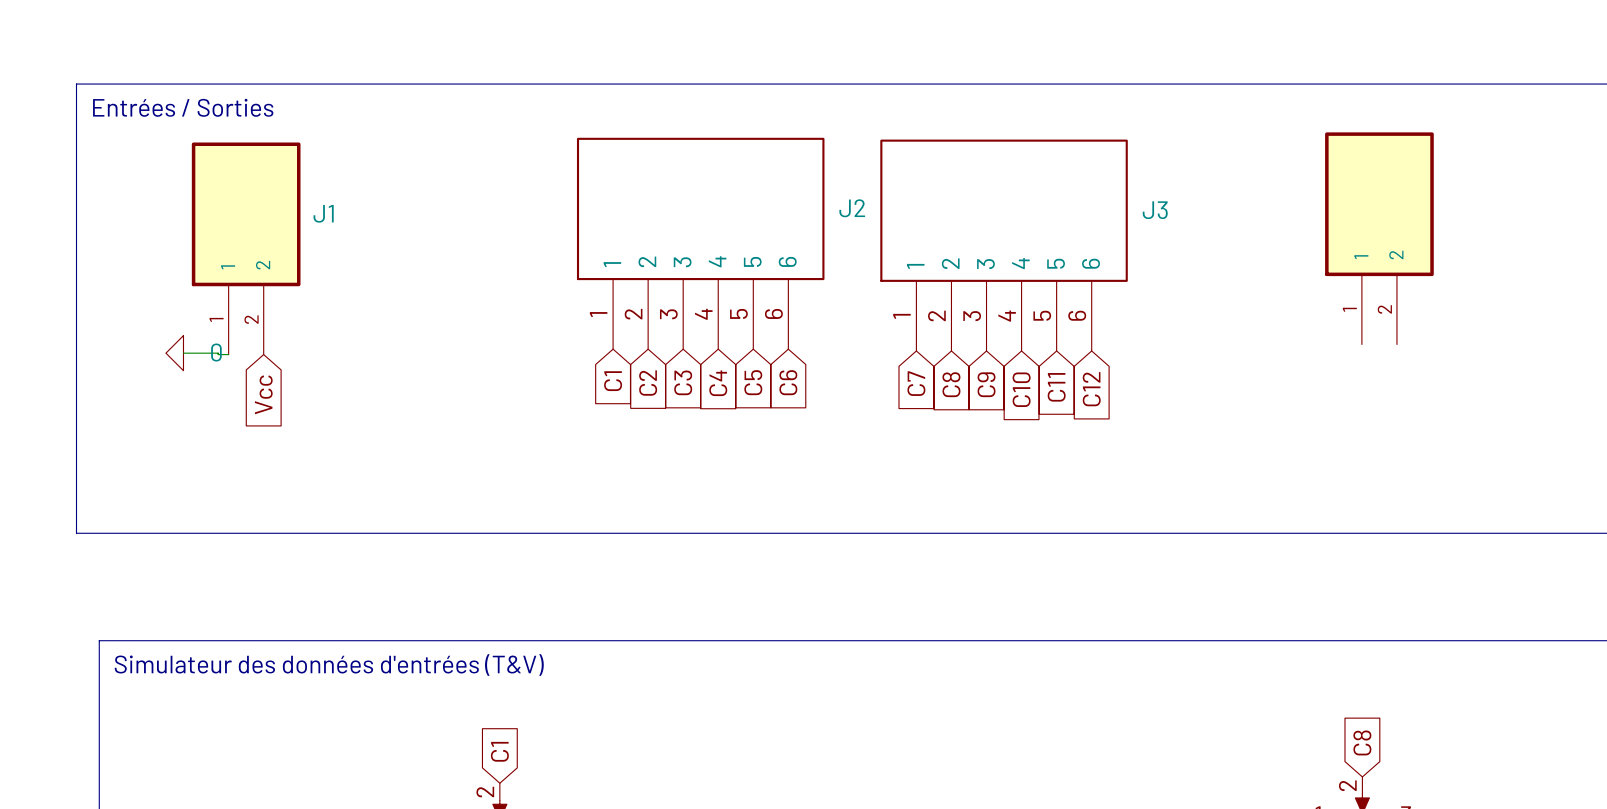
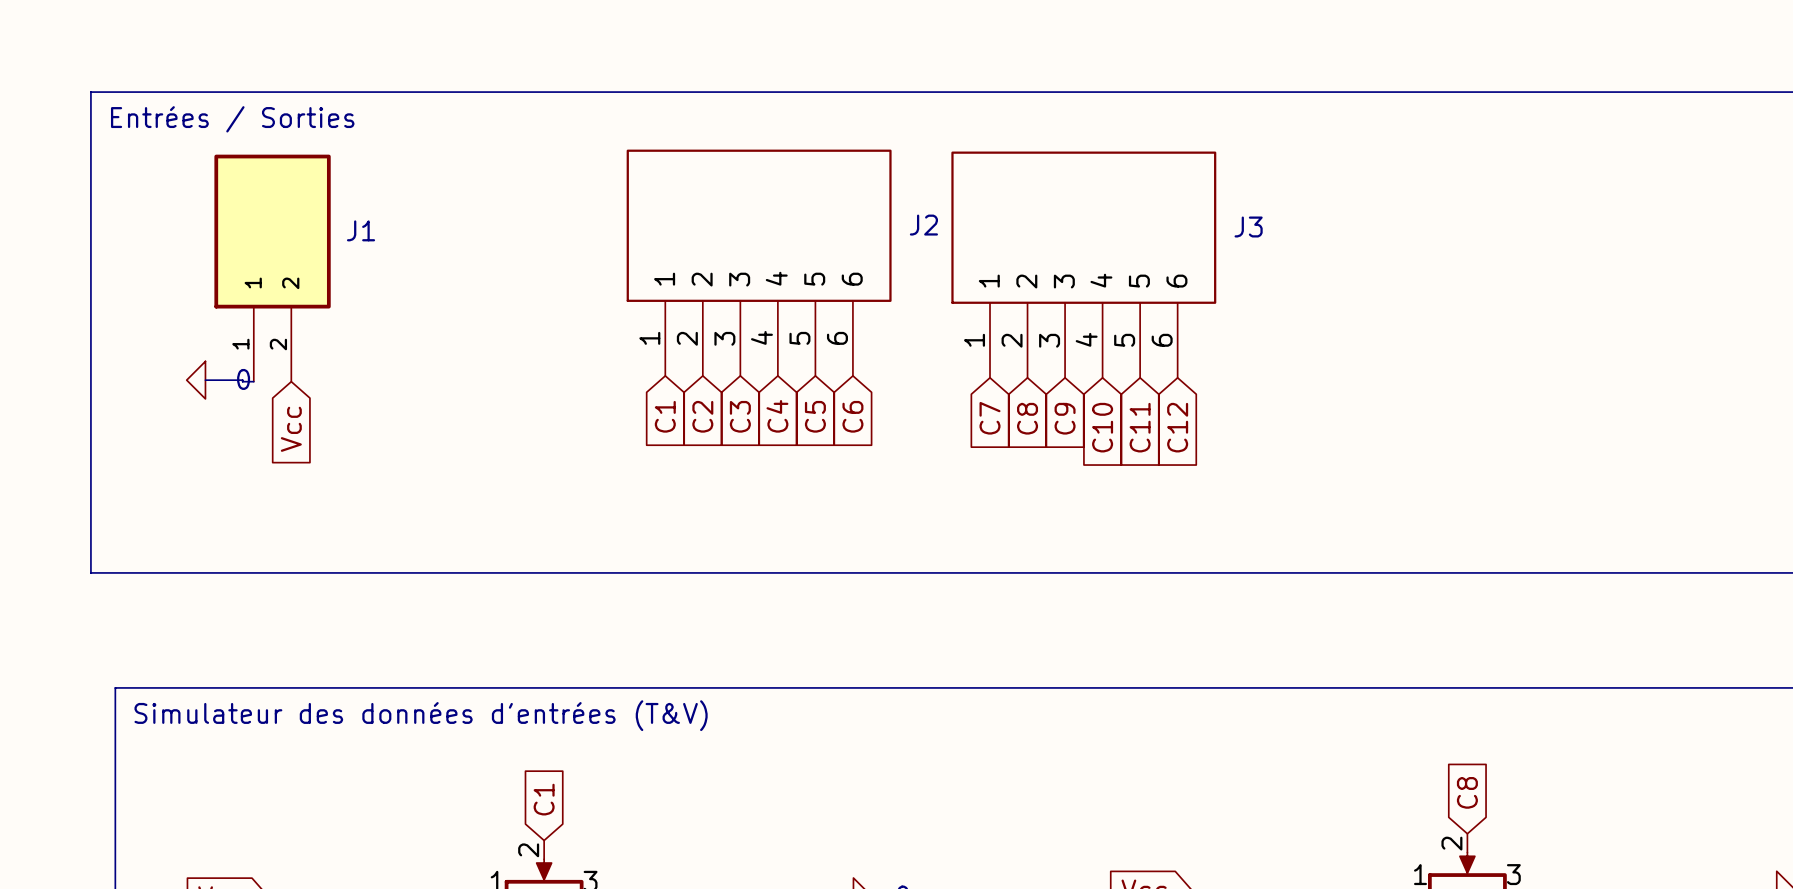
part: (1379, 238) -> none

